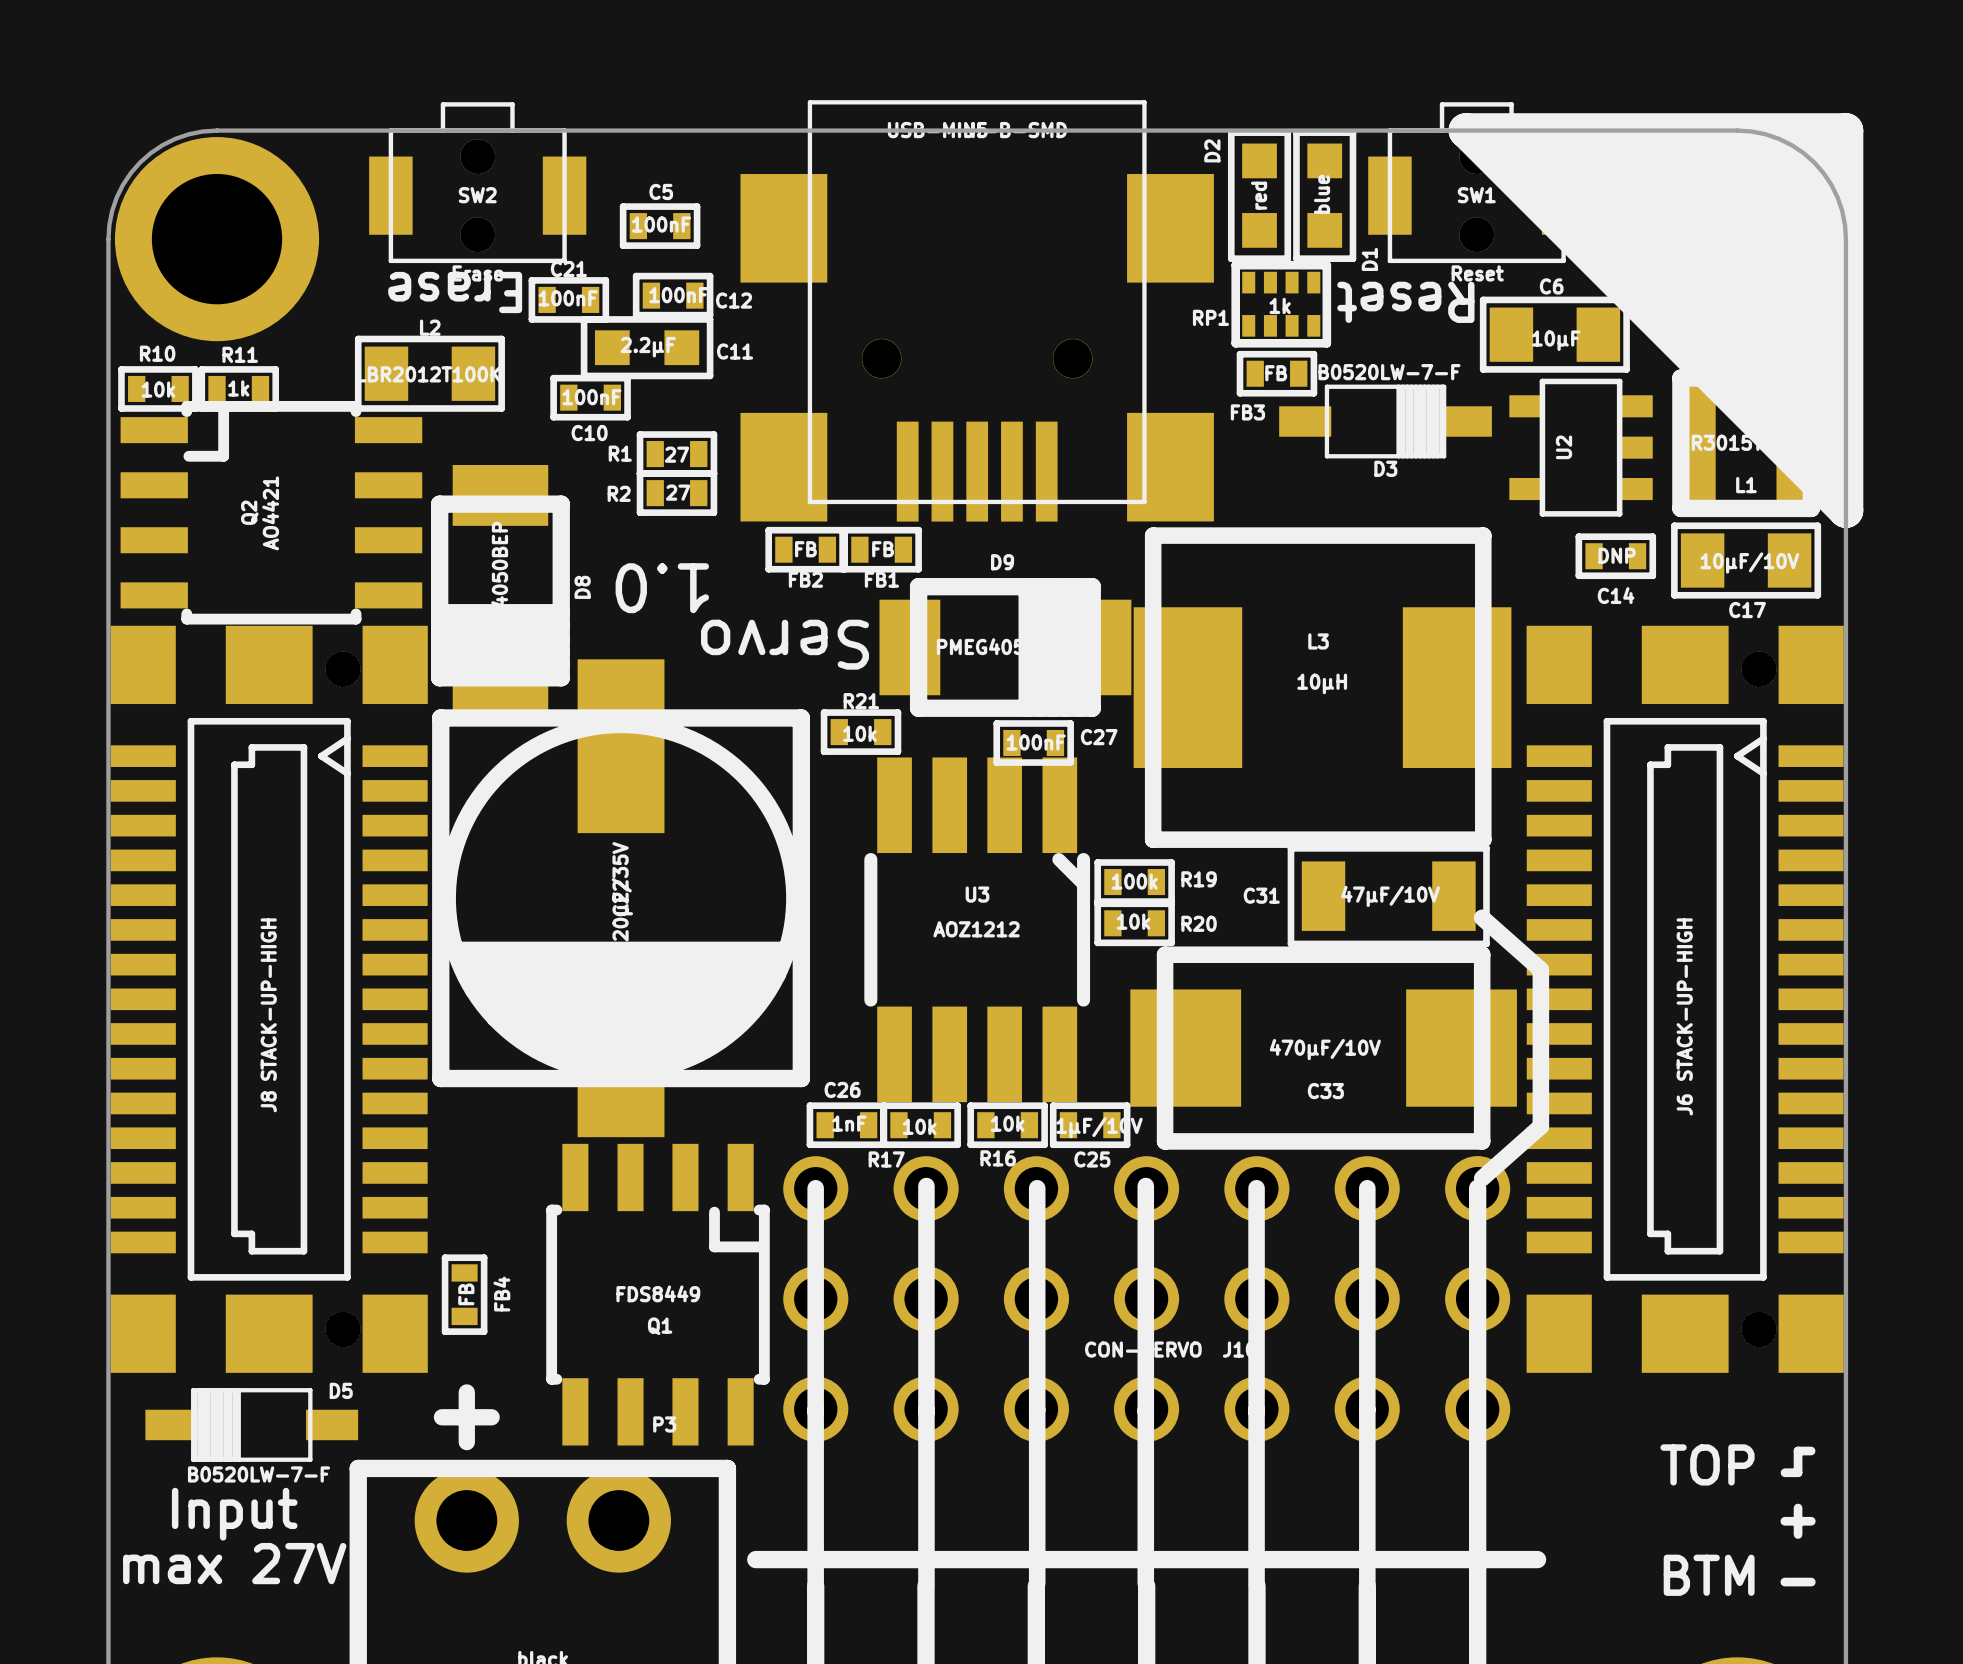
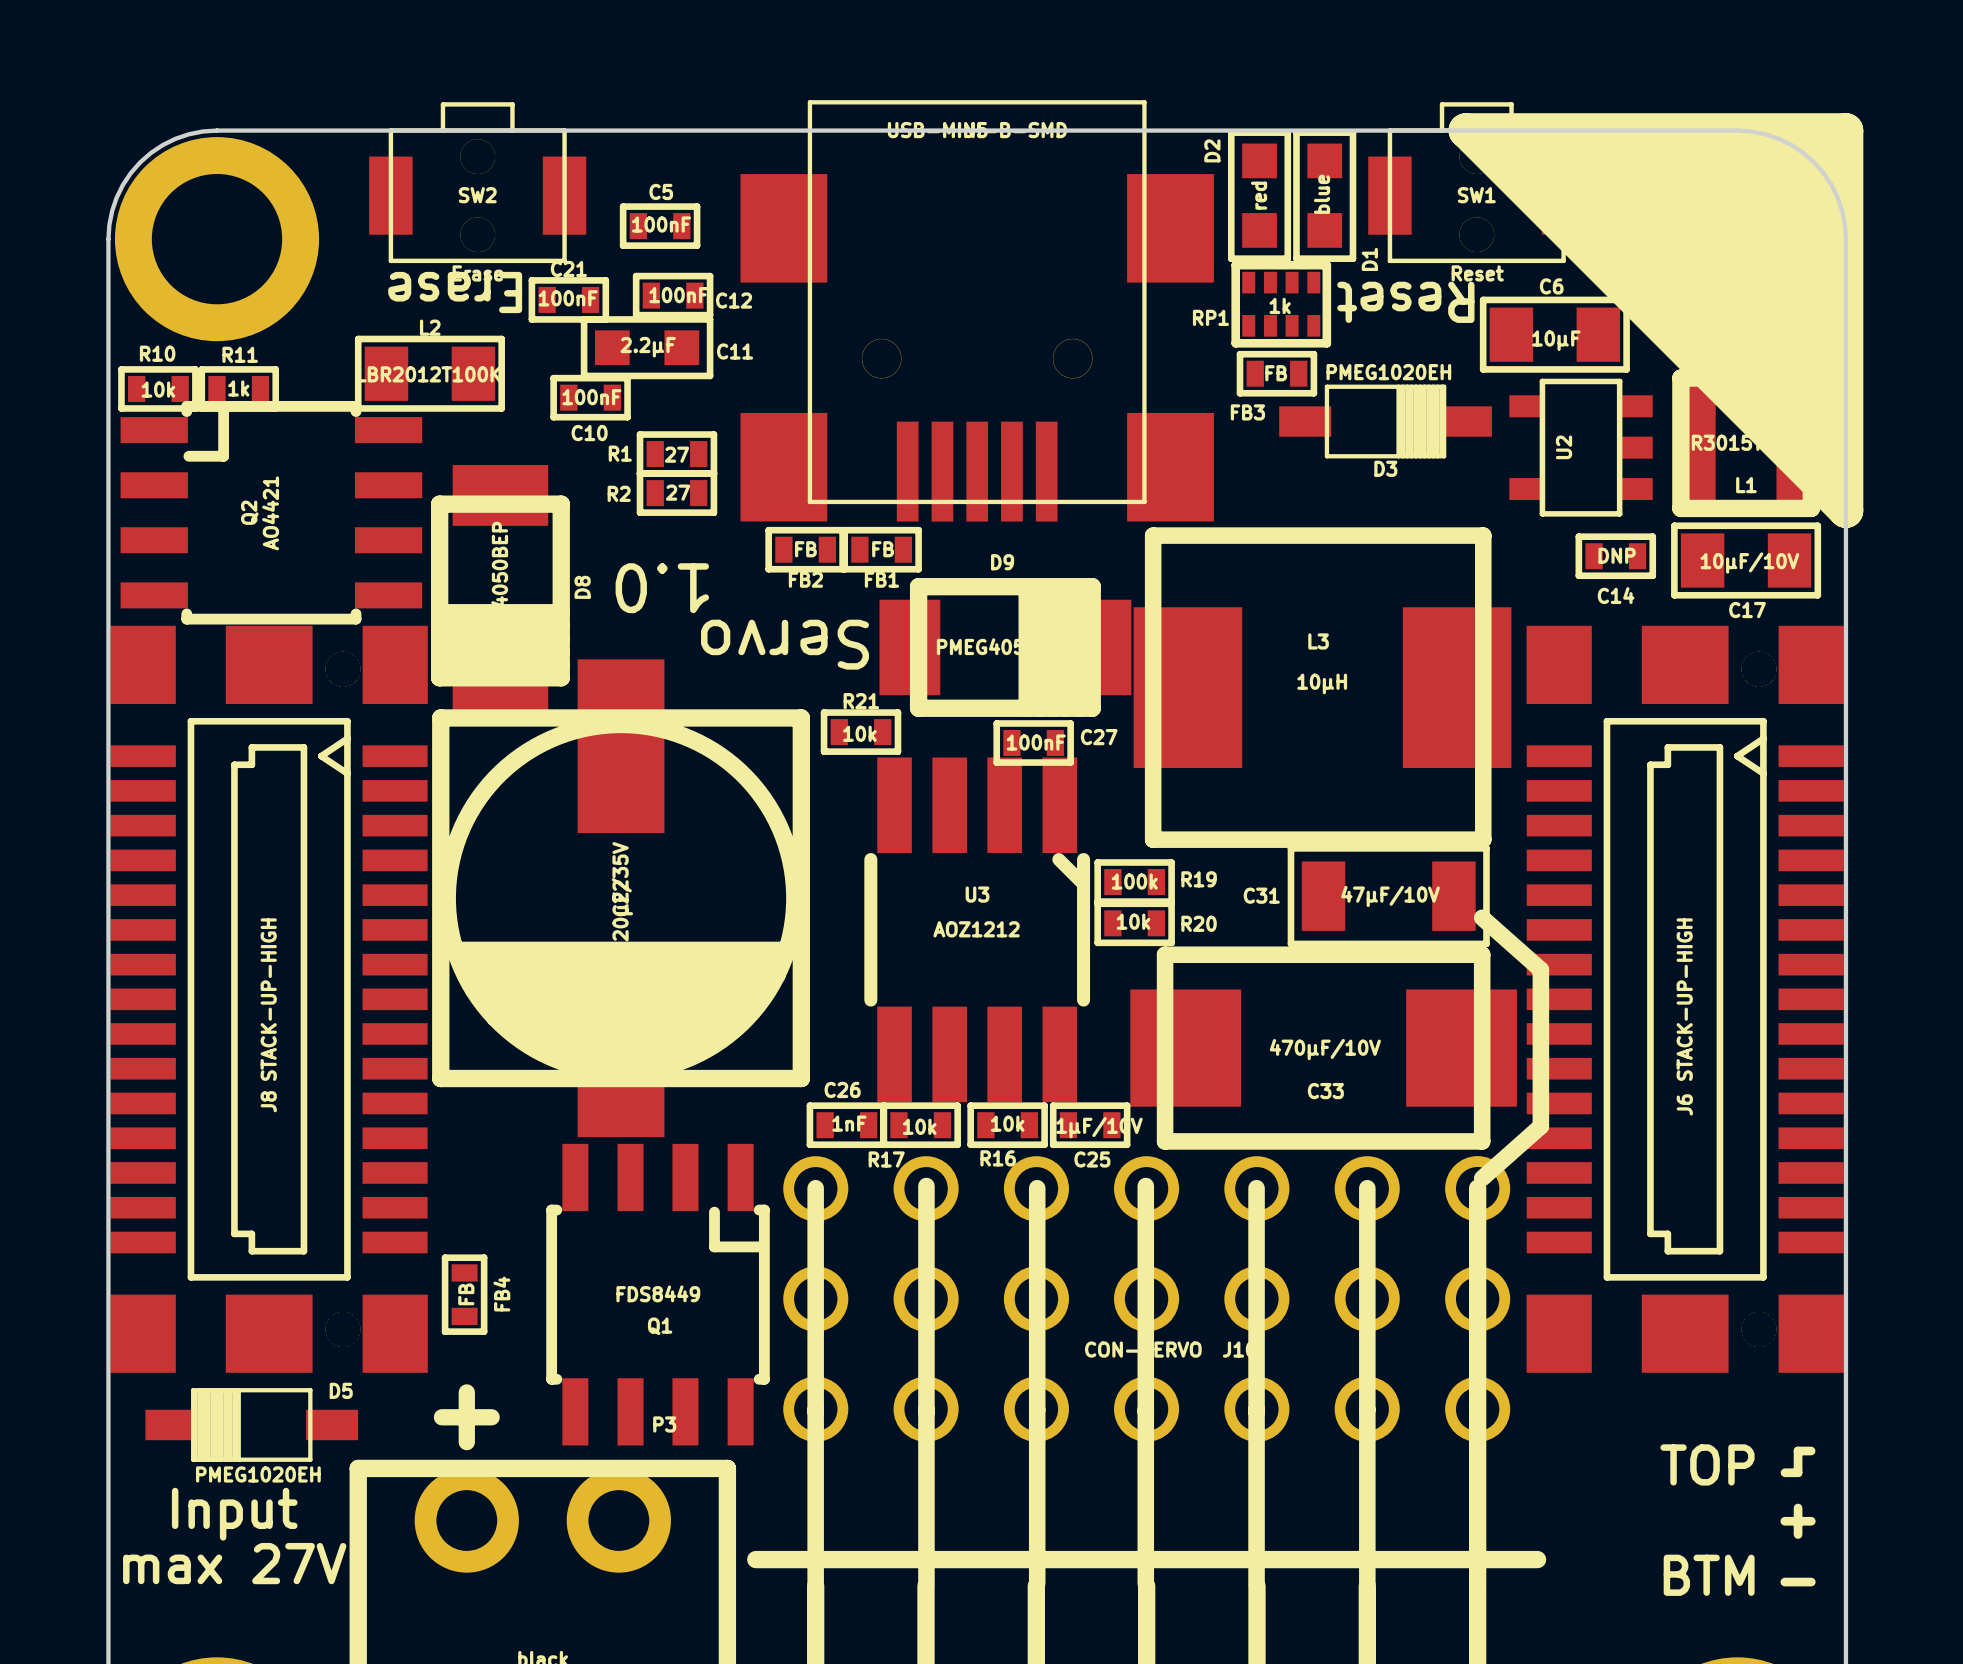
D3 value: B0520LW-7-F (1389, 372) -> PMEG1020EH (1388, 372)
D5 value: B0520LW-7-F (259, 1474) -> PMEG1020EH (258, 1474)

